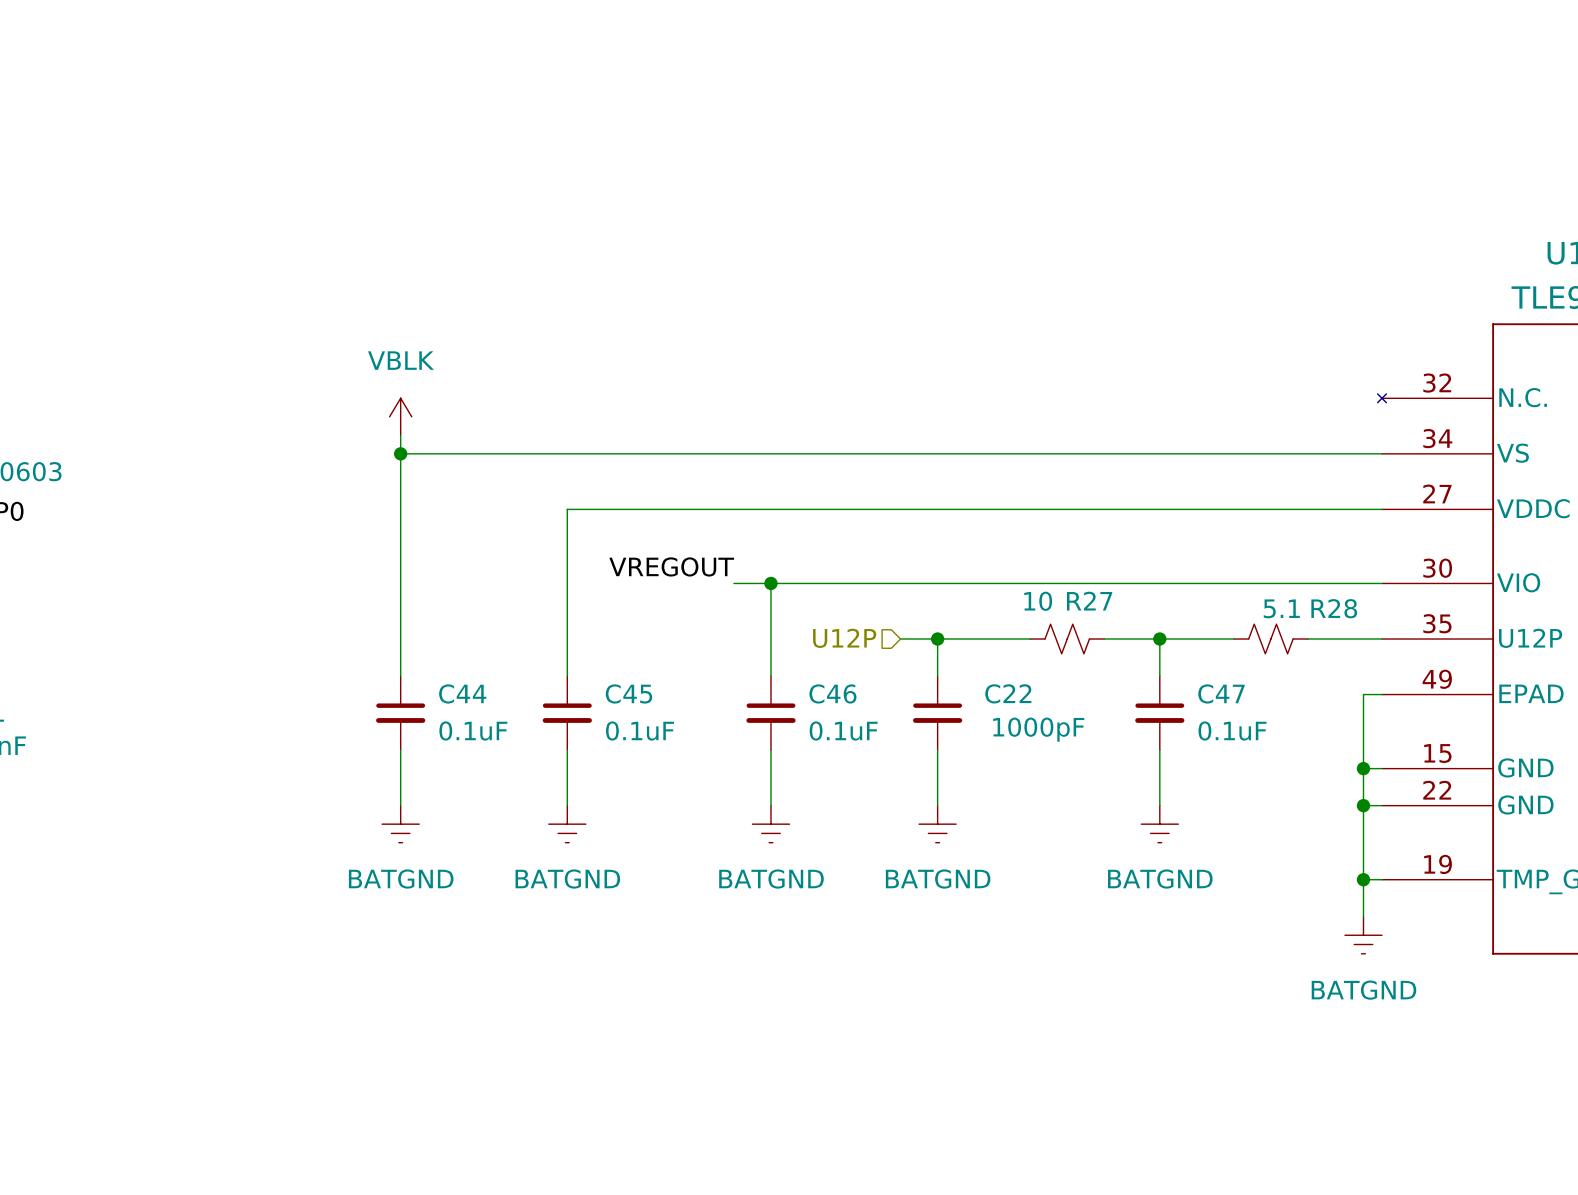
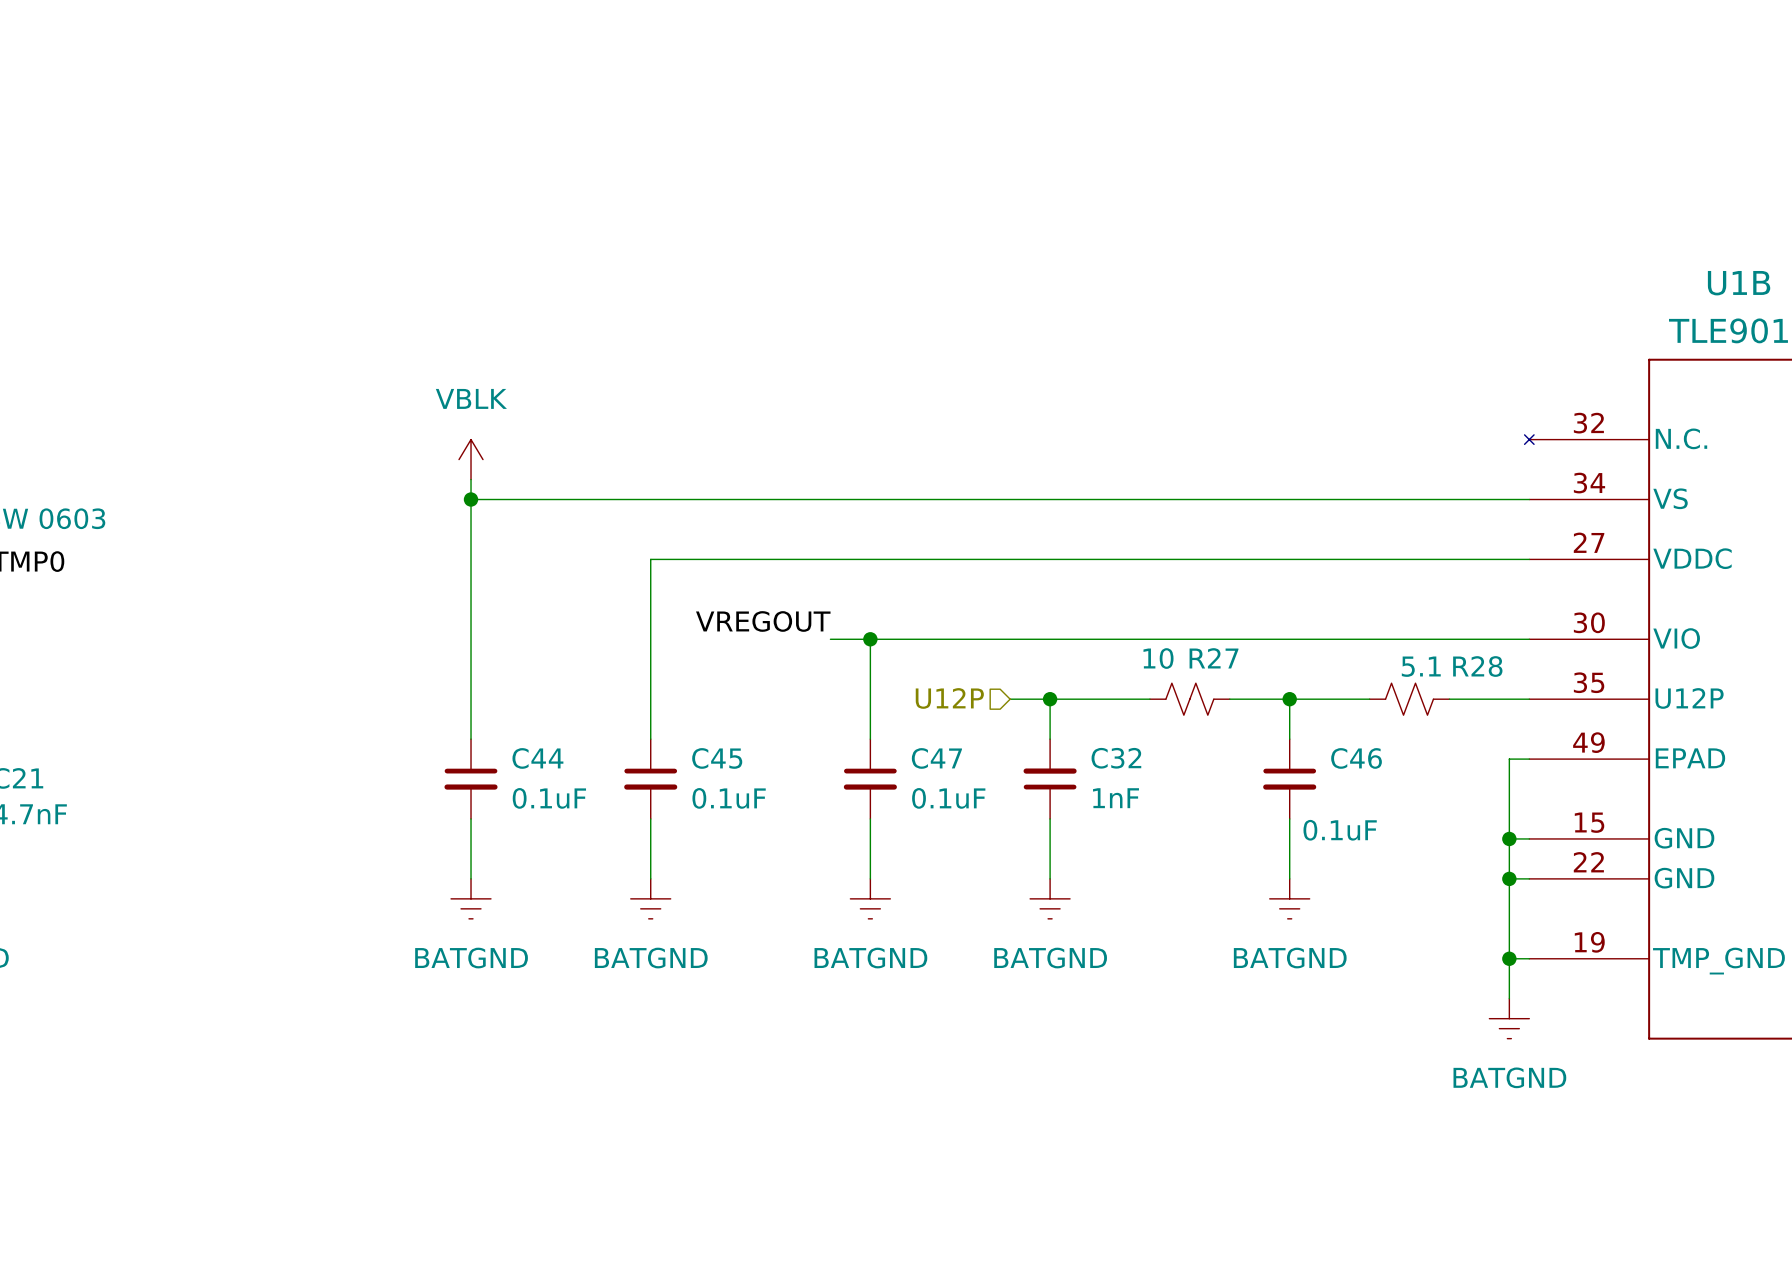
C46 name: C46 (832, 693) -> C47 (936, 758)
C47 name: C47 (1221, 693) -> C46 (1356, 758)
C22: 1000pF (937, 713) -> none
C32: none -> 1nF (1050, 779)
C47 value position: 0.1uF (1232, 730) -> 0.1uF (1340, 830)

